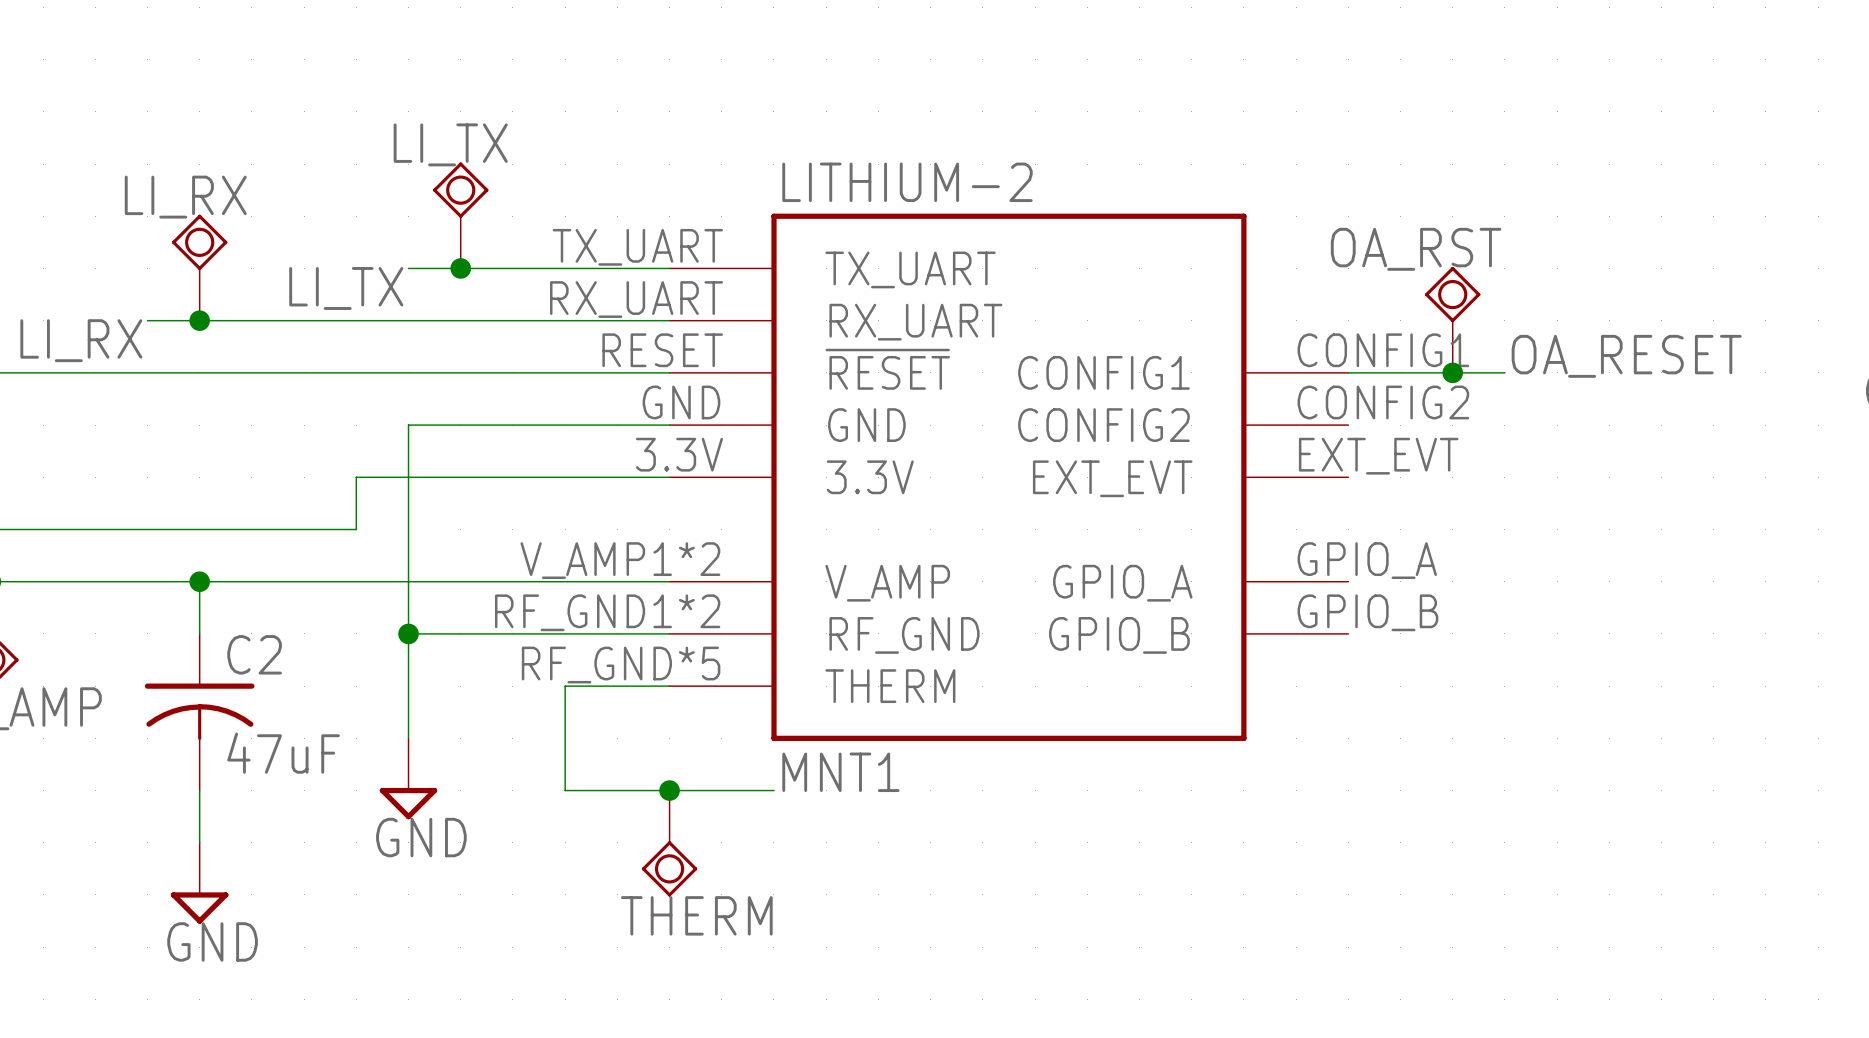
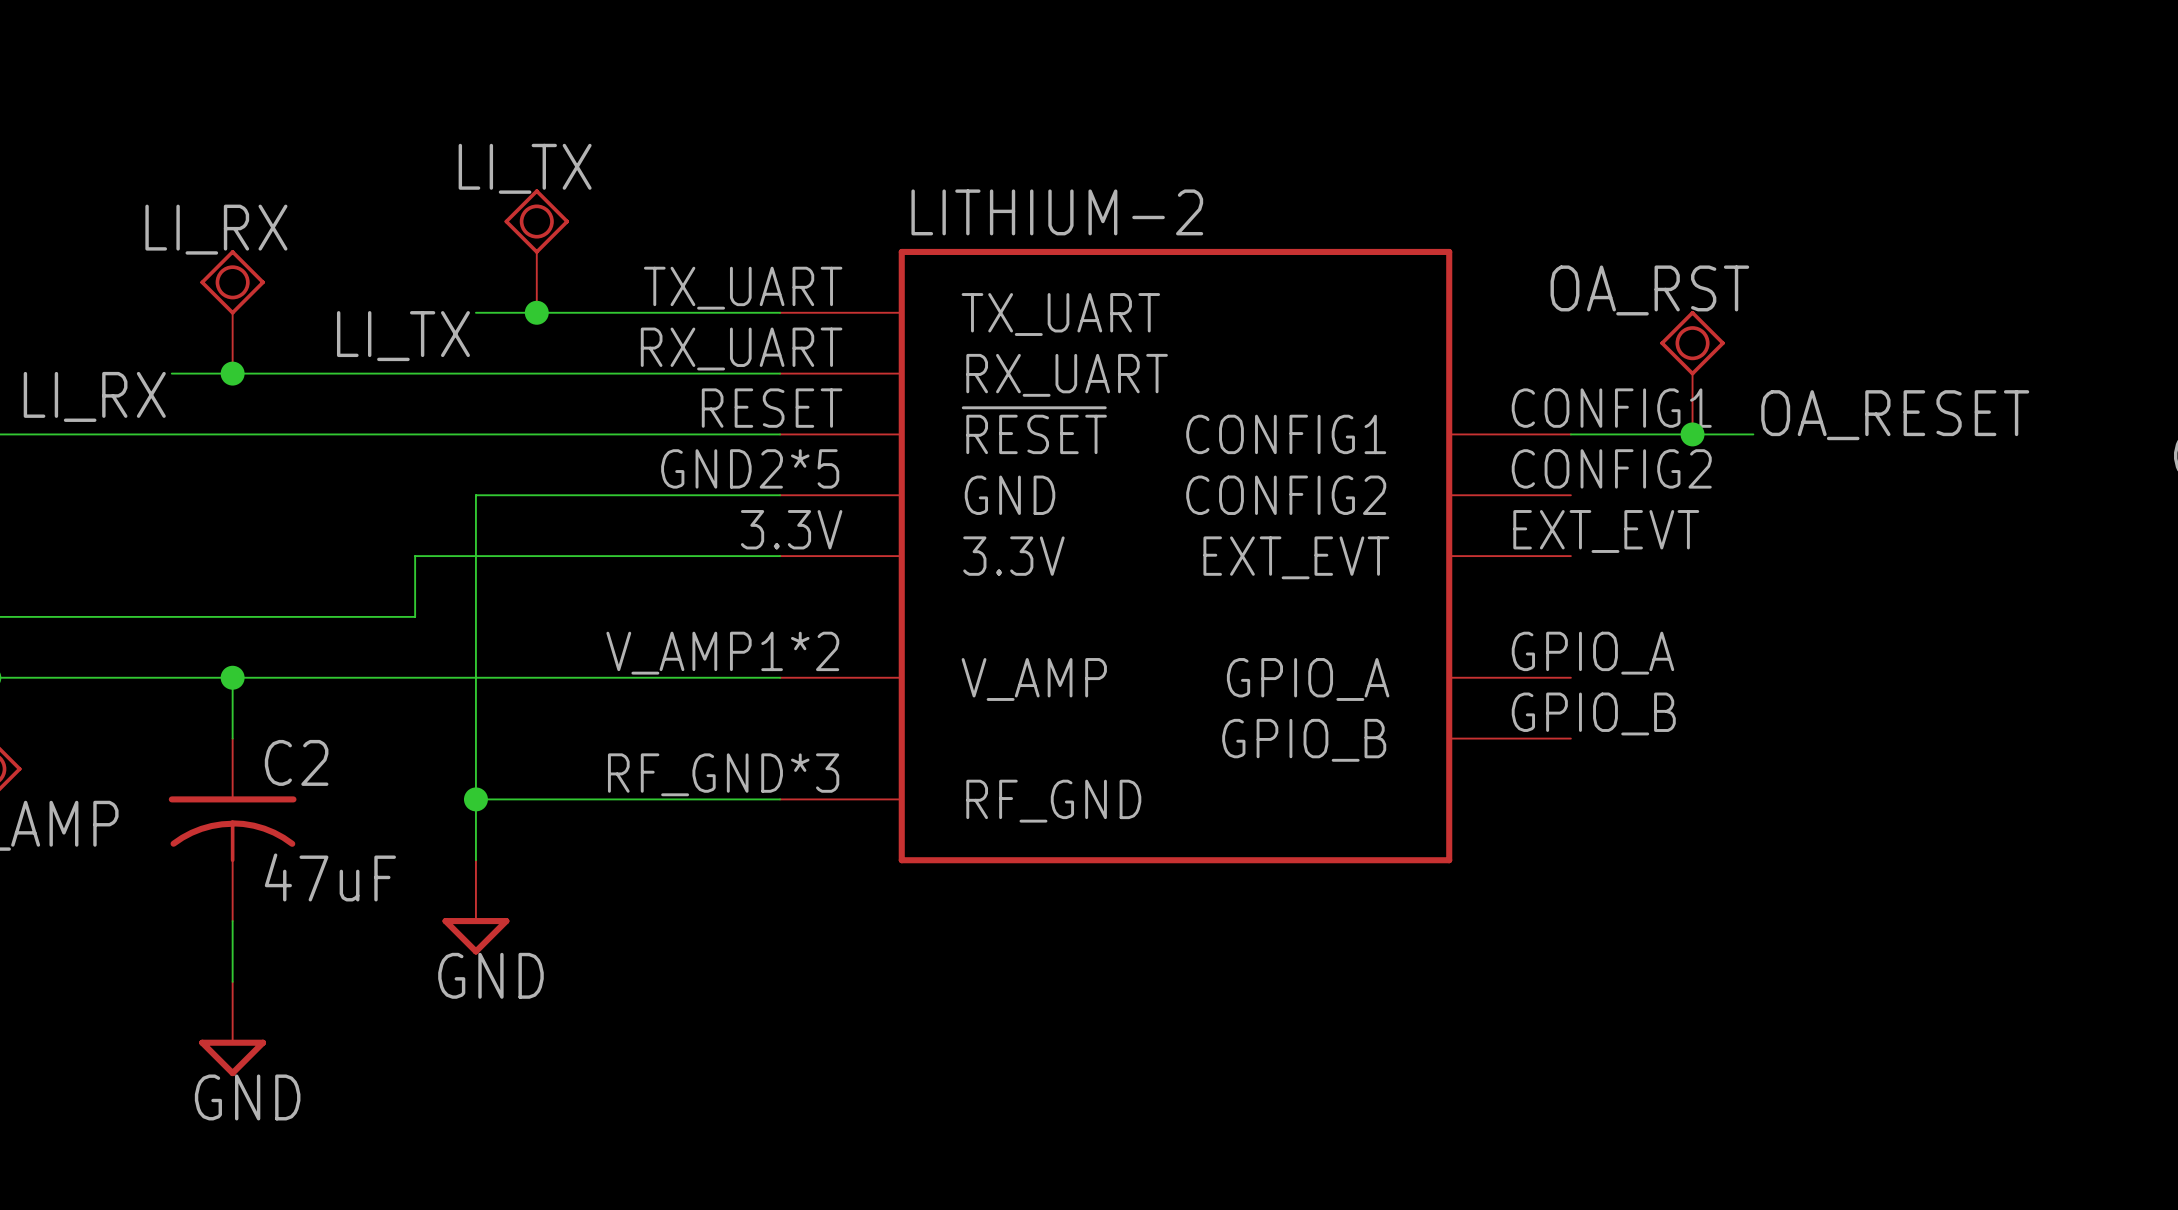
LITHIUM-2 symbol: [669, 213, 1349, 741] -> [780, 248, 1571, 864]
wire: (408, 633) (669, 633) -> none
junction position: (408, 633) -> (475, 799)
wire: (565, 686) (565, 790) (773, 790) -> (658, 799) (475, 799)
label: MNT1 (840, 772) -> none
junction: (669, 790) -> none
THERM: (669, 843) -> none

